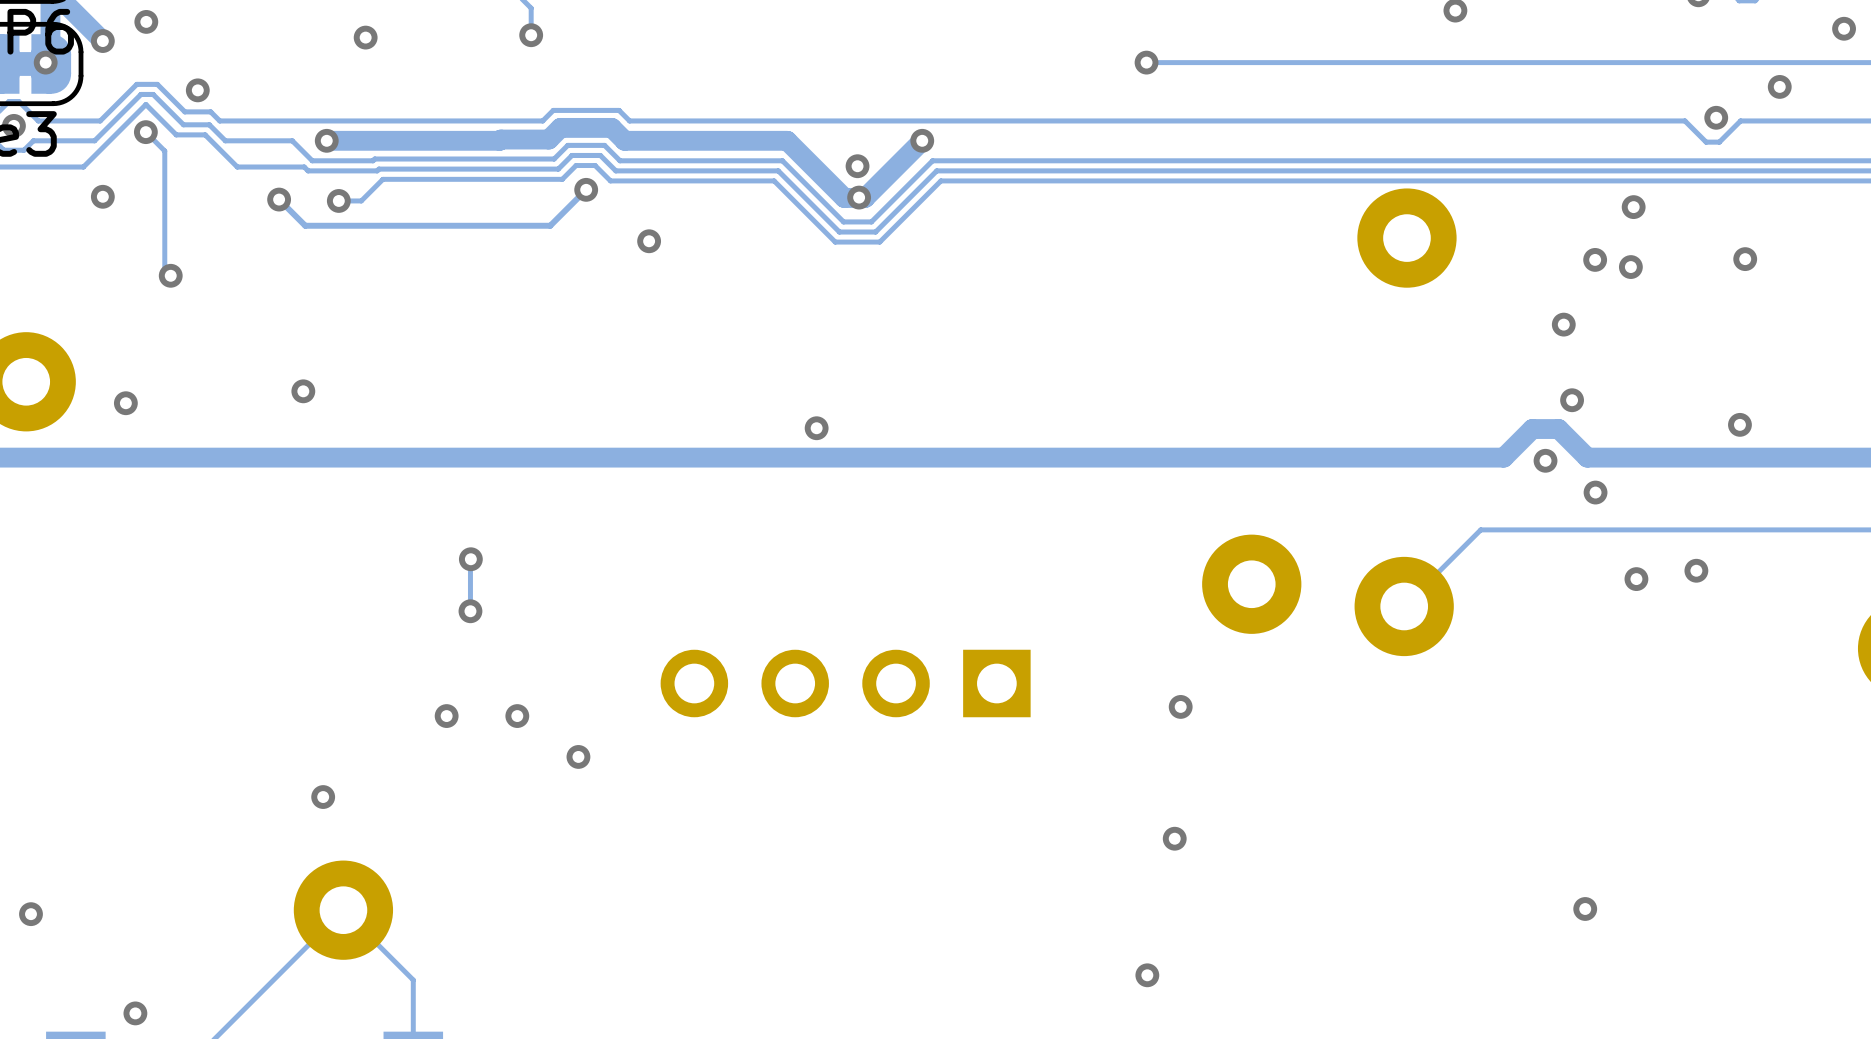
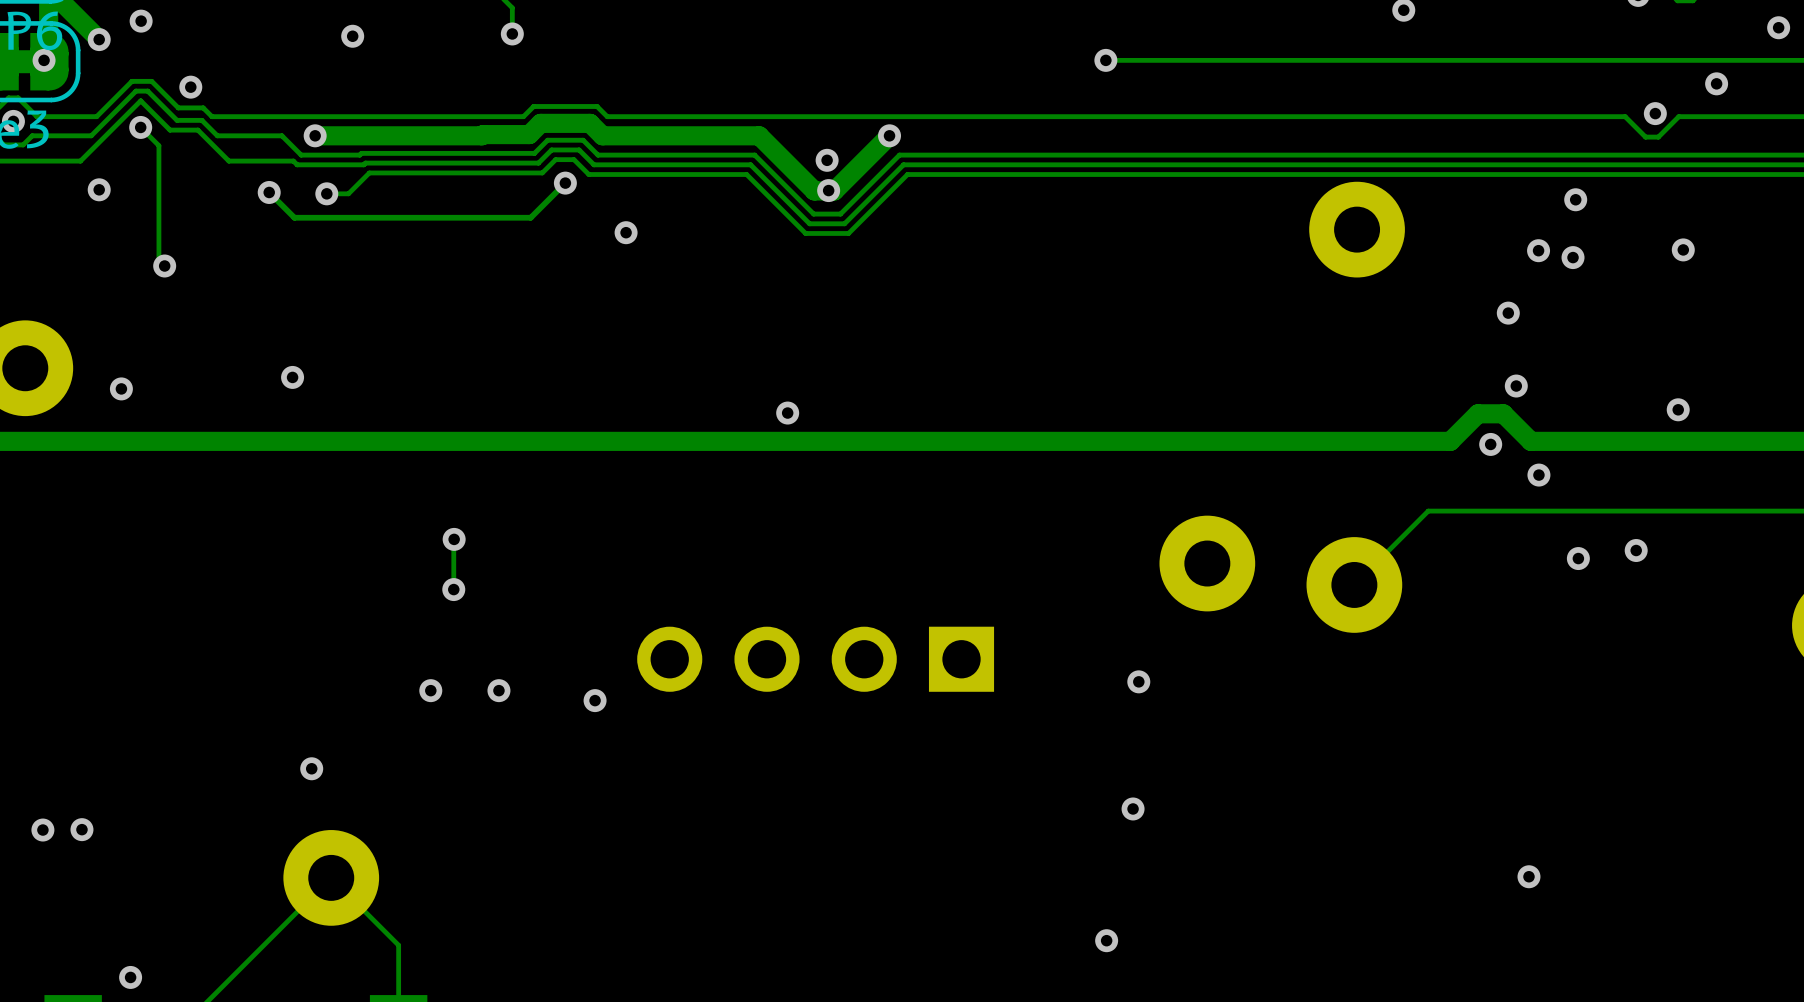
via position: (578, 756) -> (595, 700)
via: none -> (42, 830)
via: none -> (81, 829)
via: (30, 914) -> none

